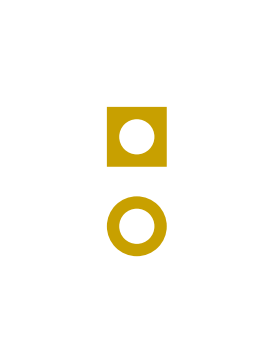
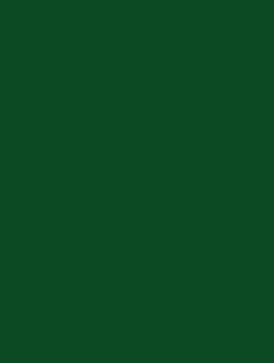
part: (136, 181) -> none

